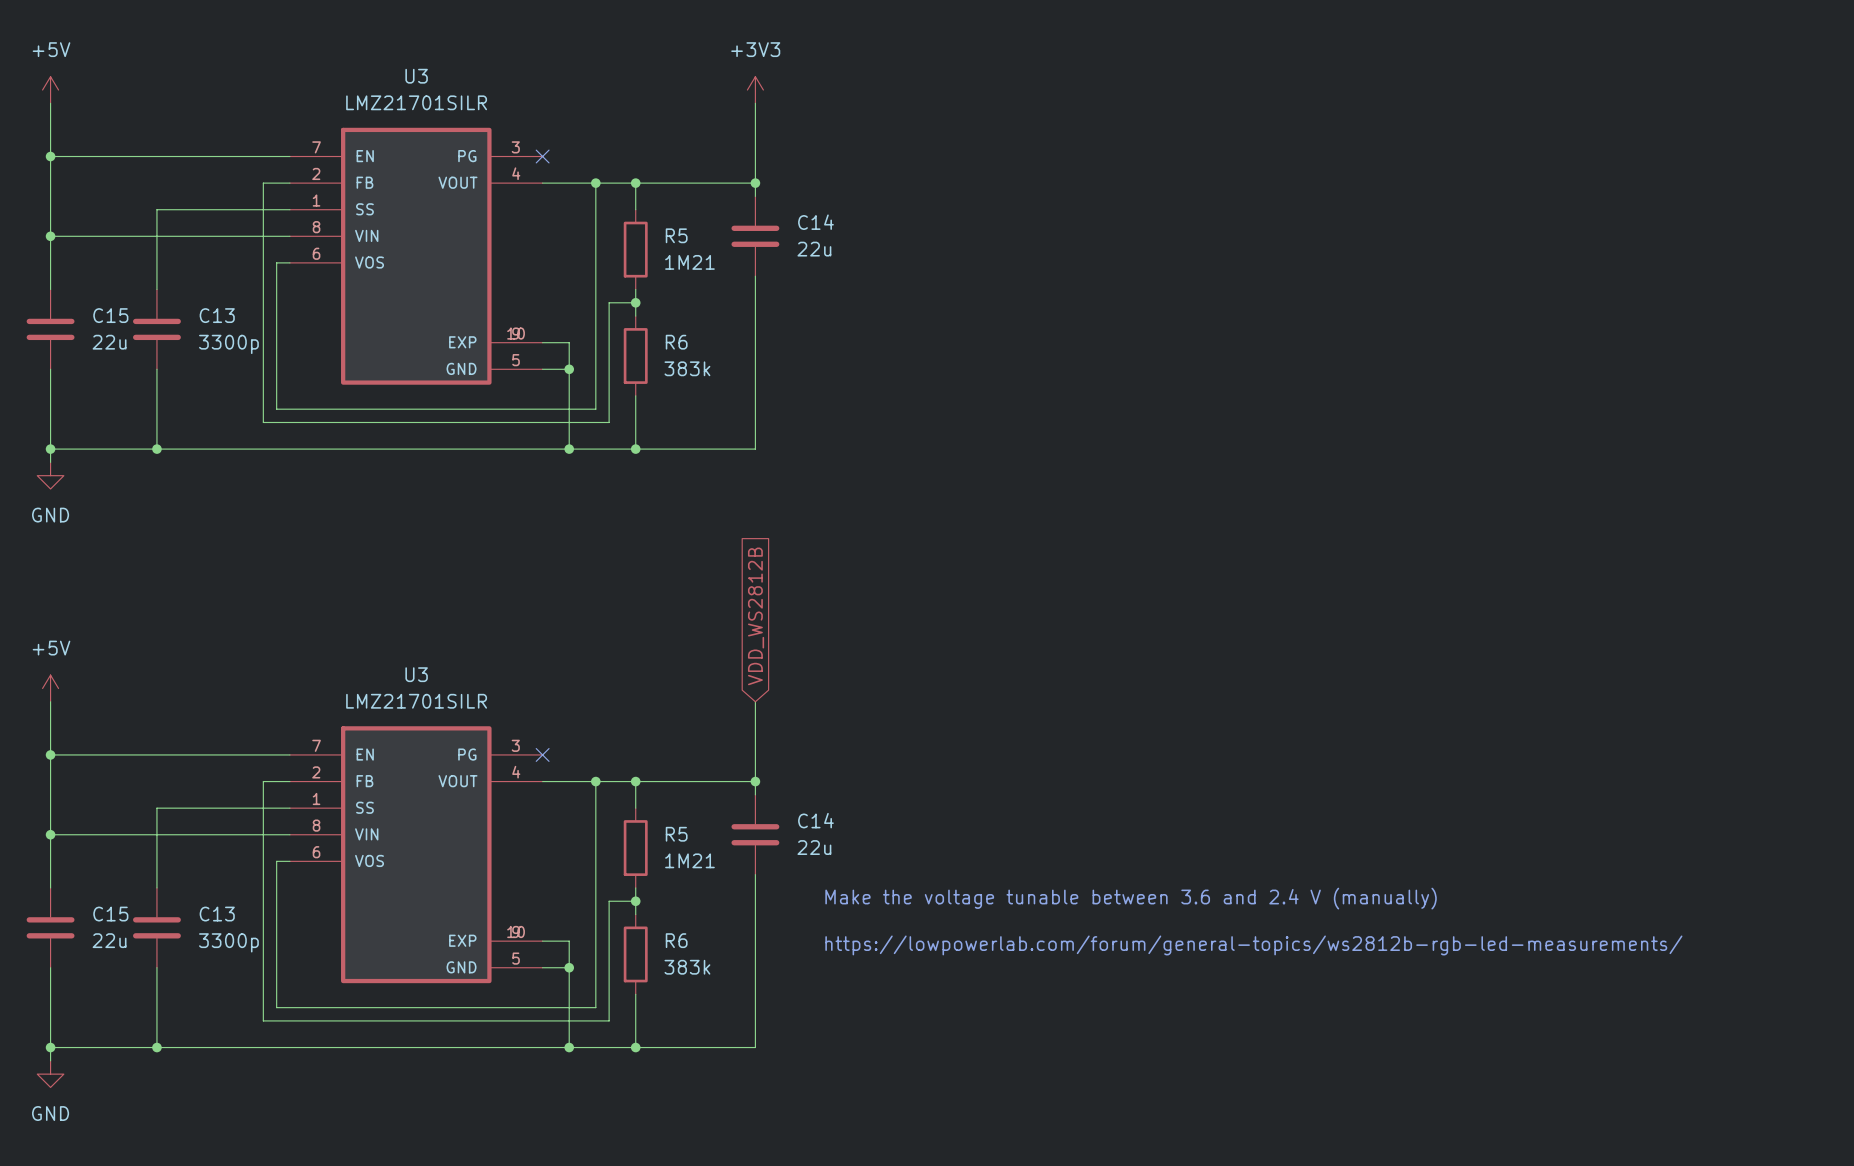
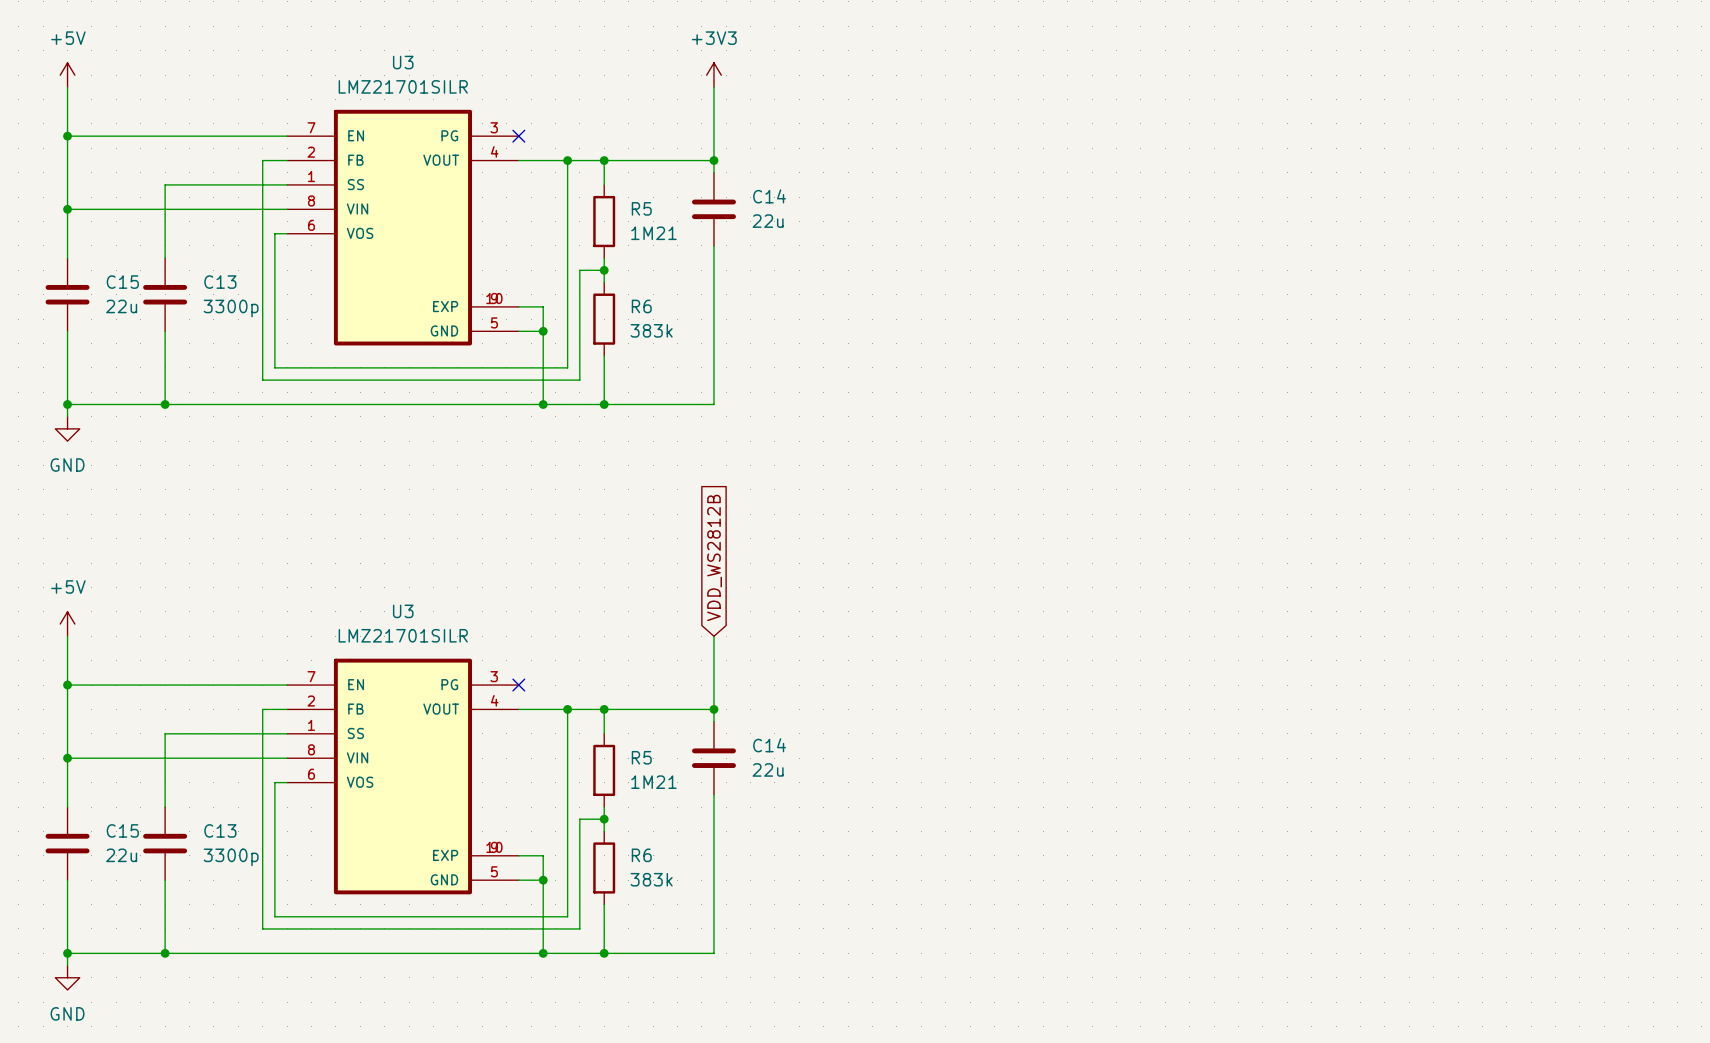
text: Make the voltage tunable between 3.6 and 2.4 V (manually) (1131, 898) -> none
text: https://lowpowerlab.com/forum/general-topics/ws2812b-rgb-led-measurements/ (1253, 945) -> none

